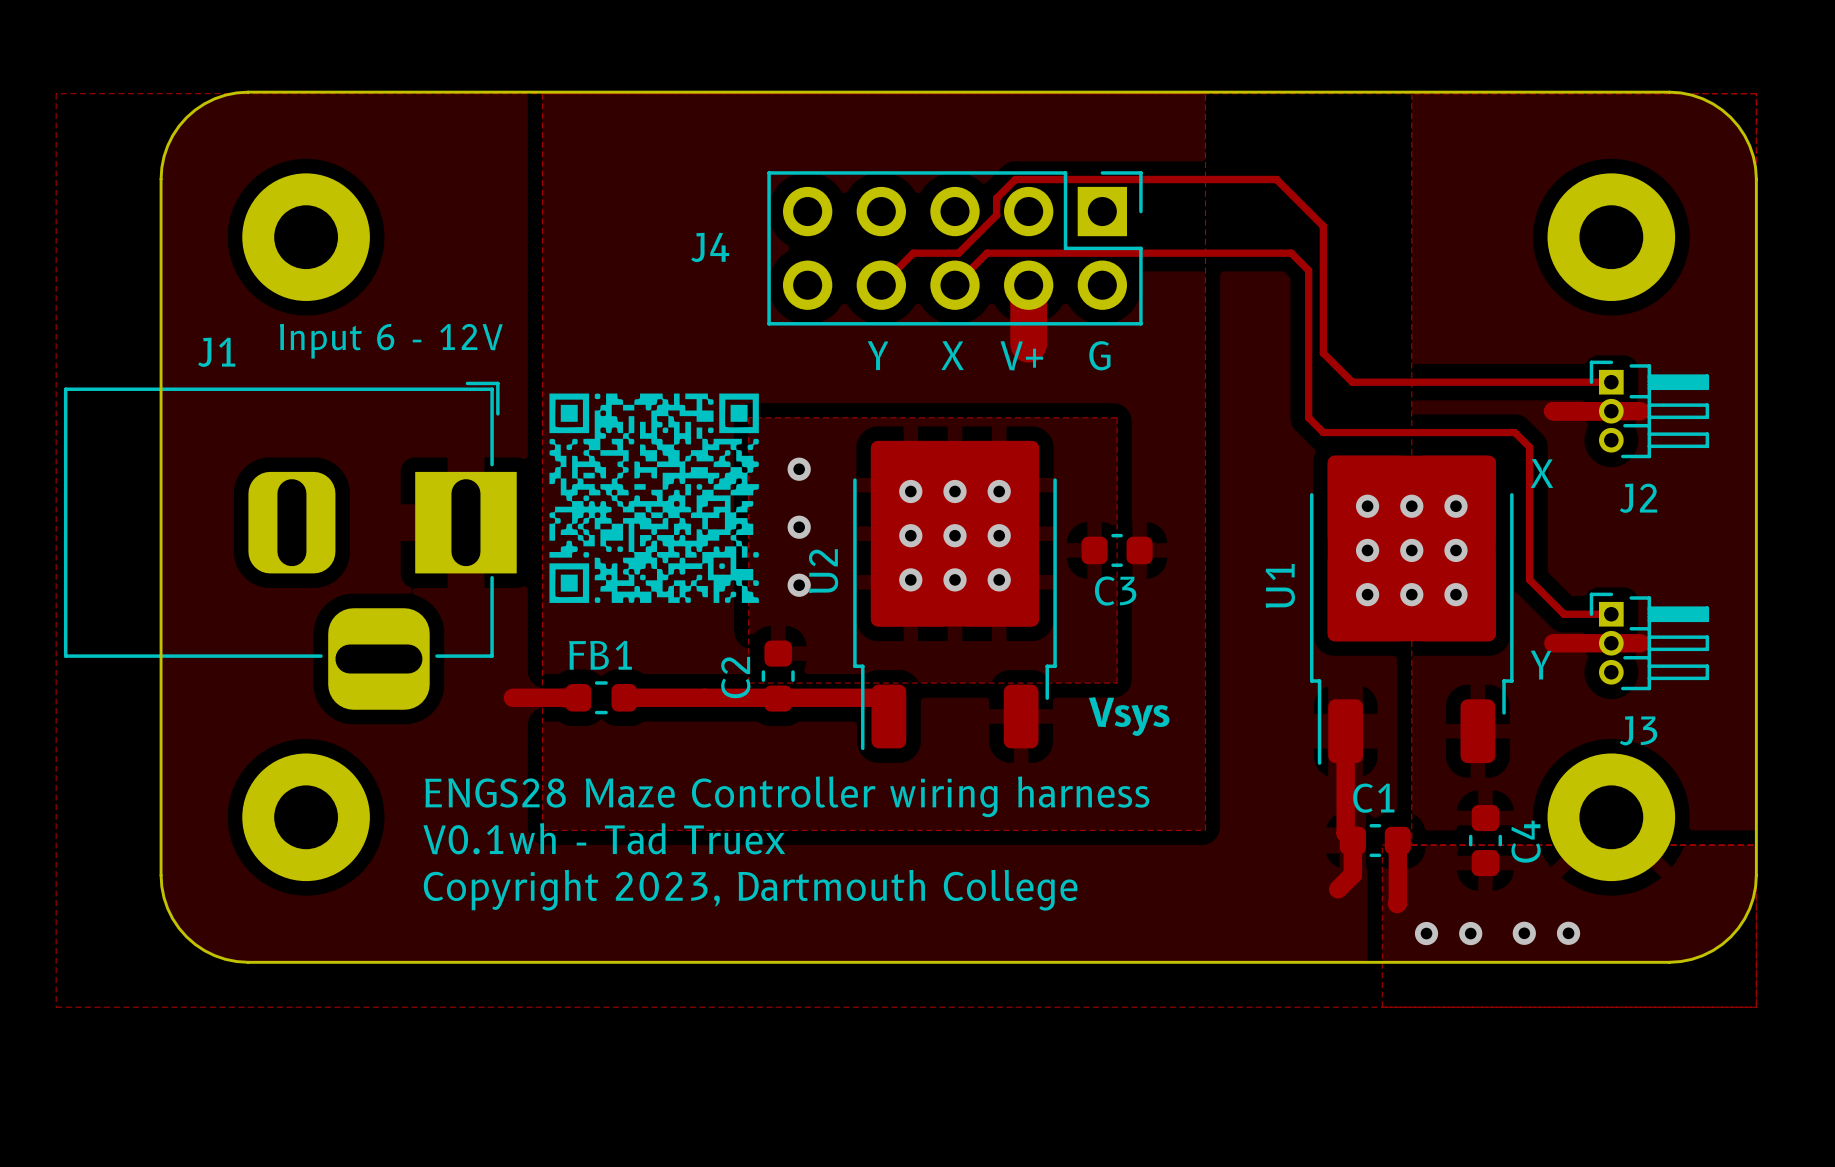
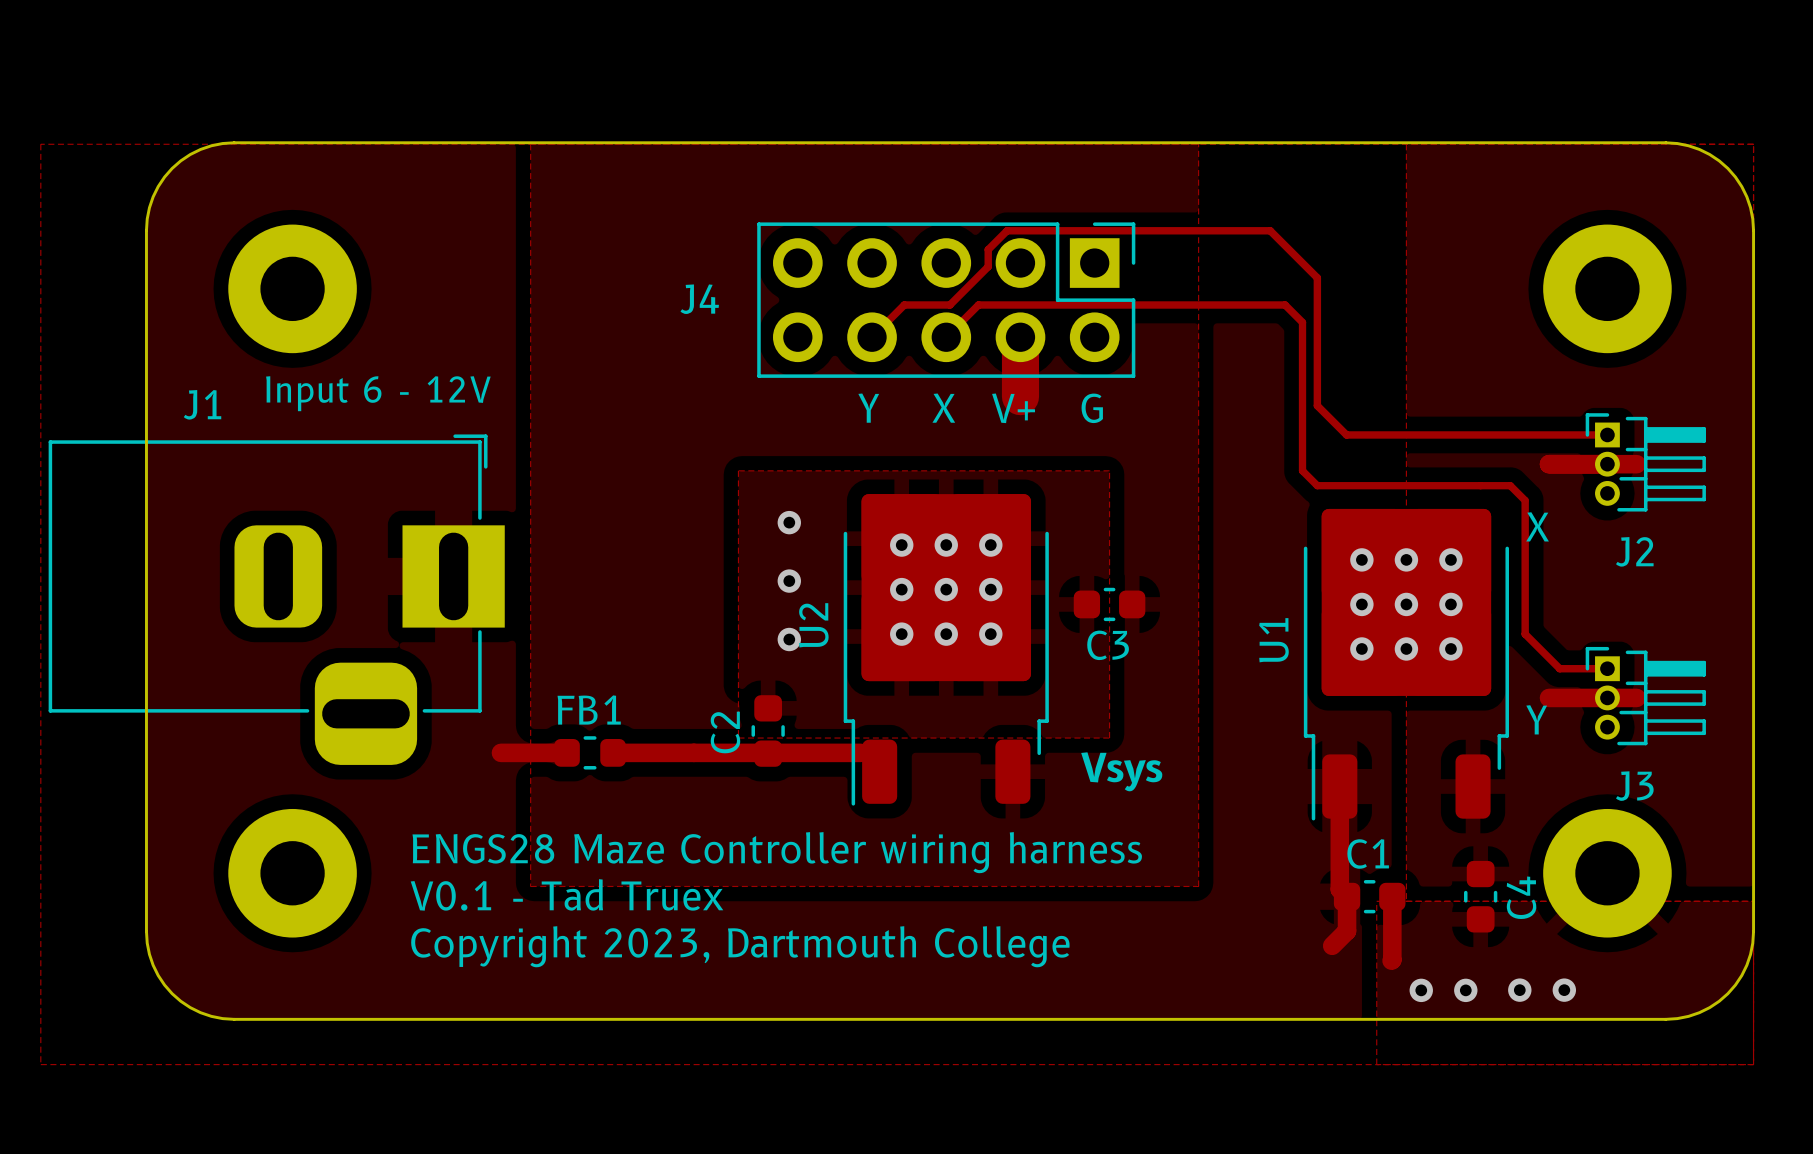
drawing: [549, 393, 759, 603] -> none
text: V0.1wh - Tad Truex (604, 838) -> V0.1 - Tad Truex (567, 894)

